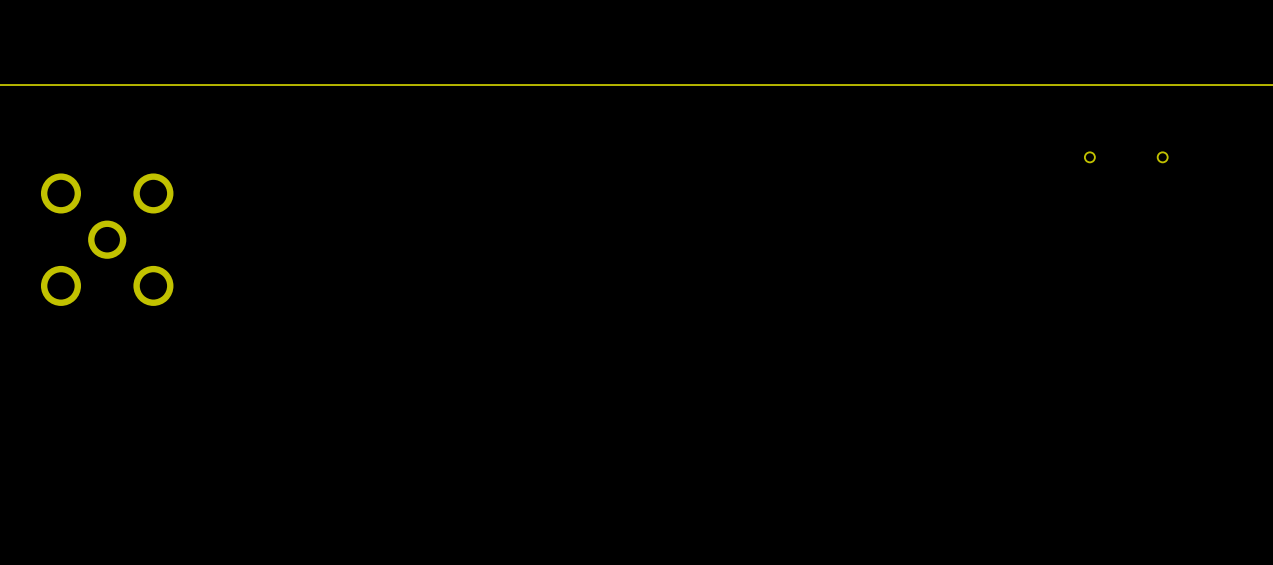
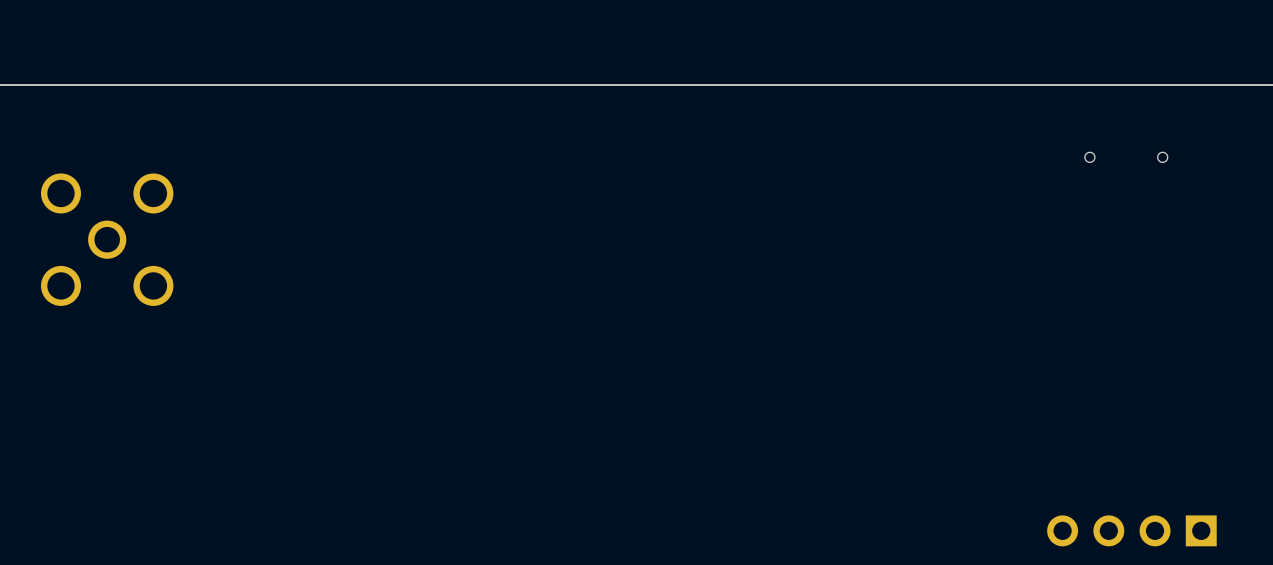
part: none -> (1131, 530)

